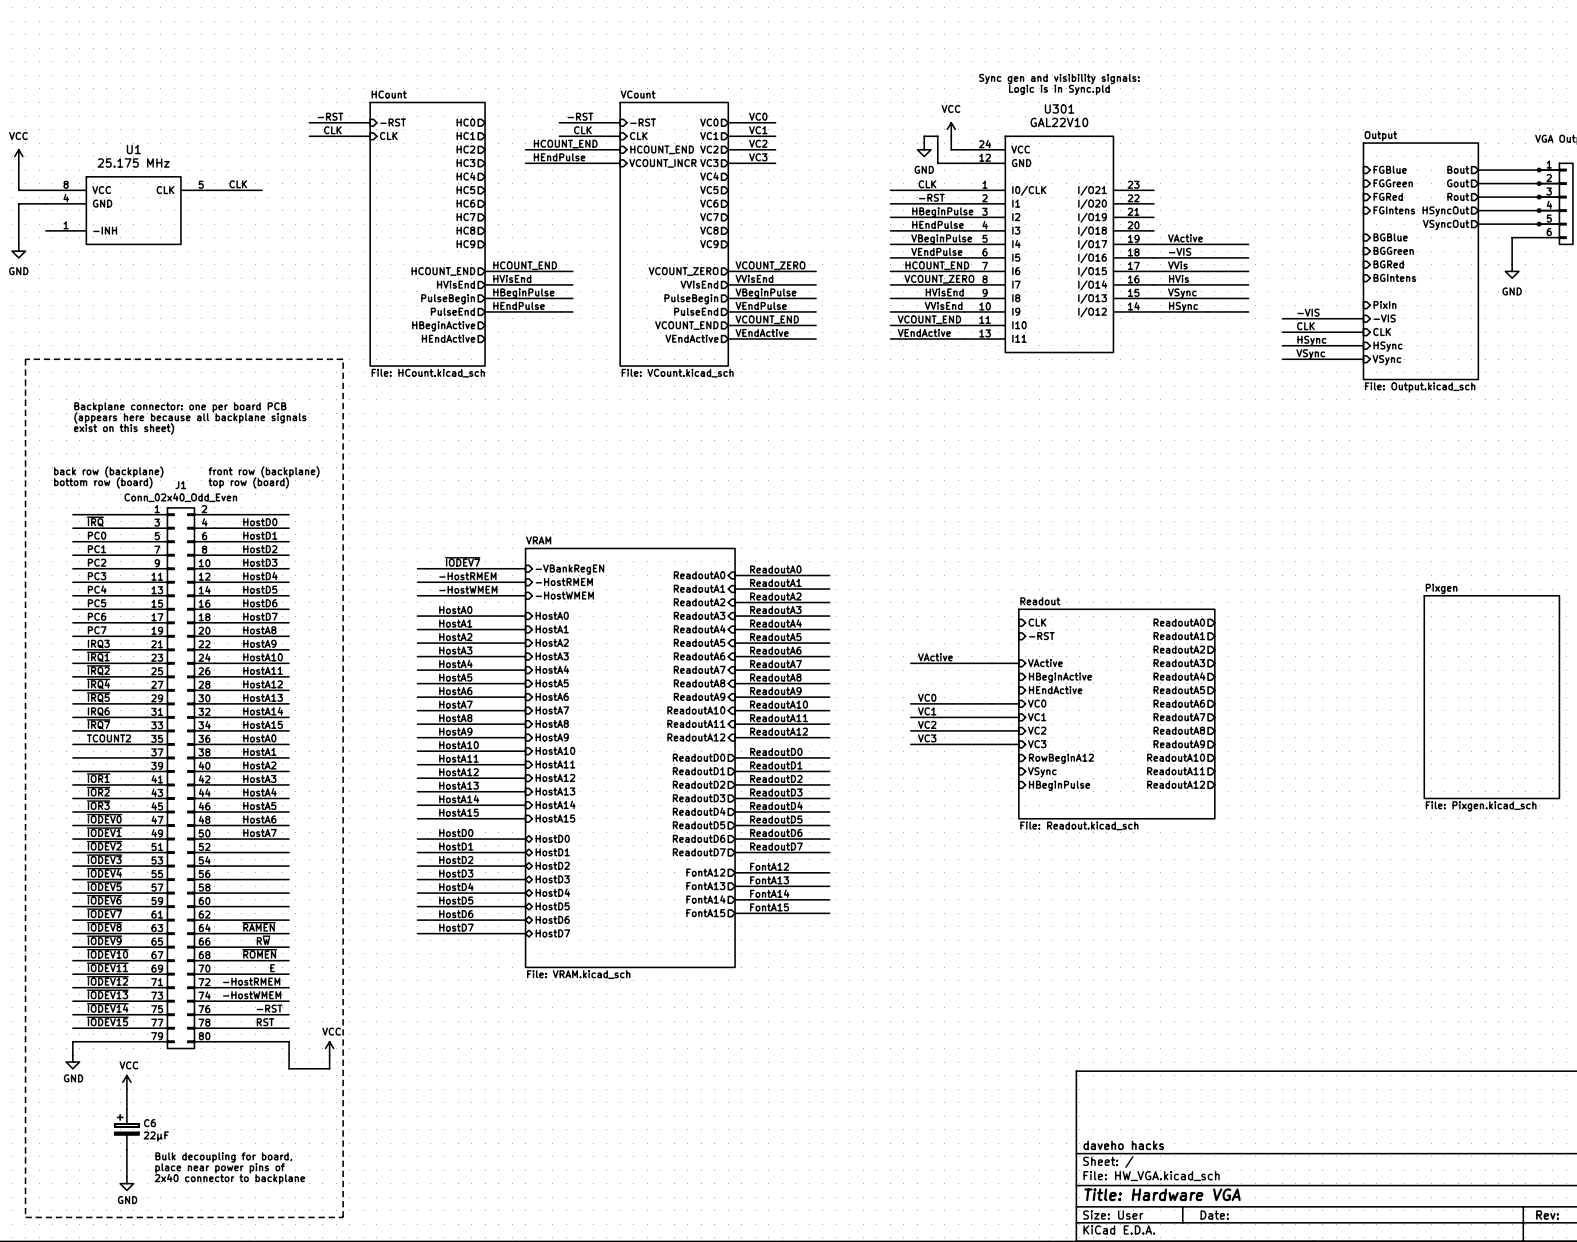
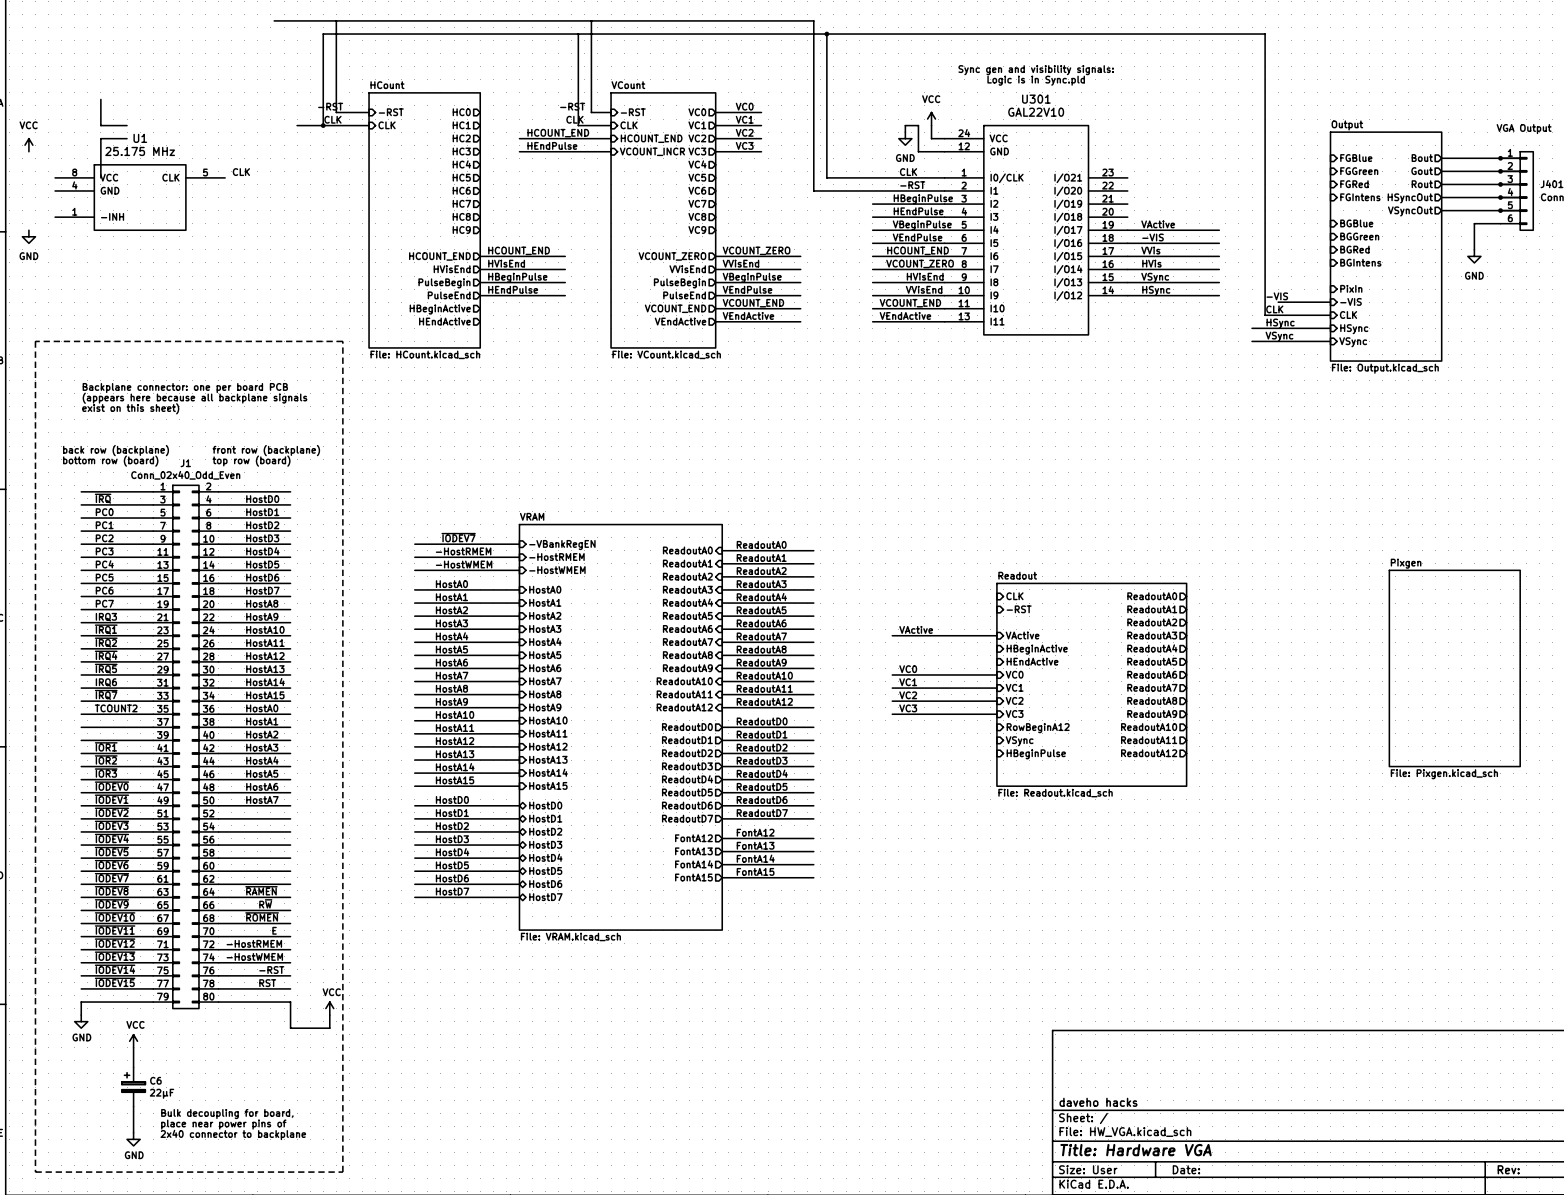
wire: none -> (274, 20) (813, 20) (813, 190) (872, 190)
wire: none -> (826, 34) (826, 177) (872, 177)
junction: none -> (826, 34)
wire: (309, 122) (336, 122) -> (336, 20) (336, 112)
wire: (559, 122) (599, 122) -> (591, 20) (591, 112)
wire: none -> (297, 125) (310, 125)
junction: none -> (323, 125)
wire: (559, 136) (586, 136) -> (578, 34) (578, 125)
wire: (18, 163) (18, 190) (45, 190) -> (100, 99) (100, 125) (127, 125)
wire: (221, 190) (262, 190) -> none
wire: (45, 203) (18, 203) (18, 244) -> (127, 138) (100, 138) (100, 177)
wire: (1282, 318) (1309, 318) -> none
wire: (1282, 332) (1295, 332) -> (323, 125) (323, 34) (1265, 34) (1265, 315)

